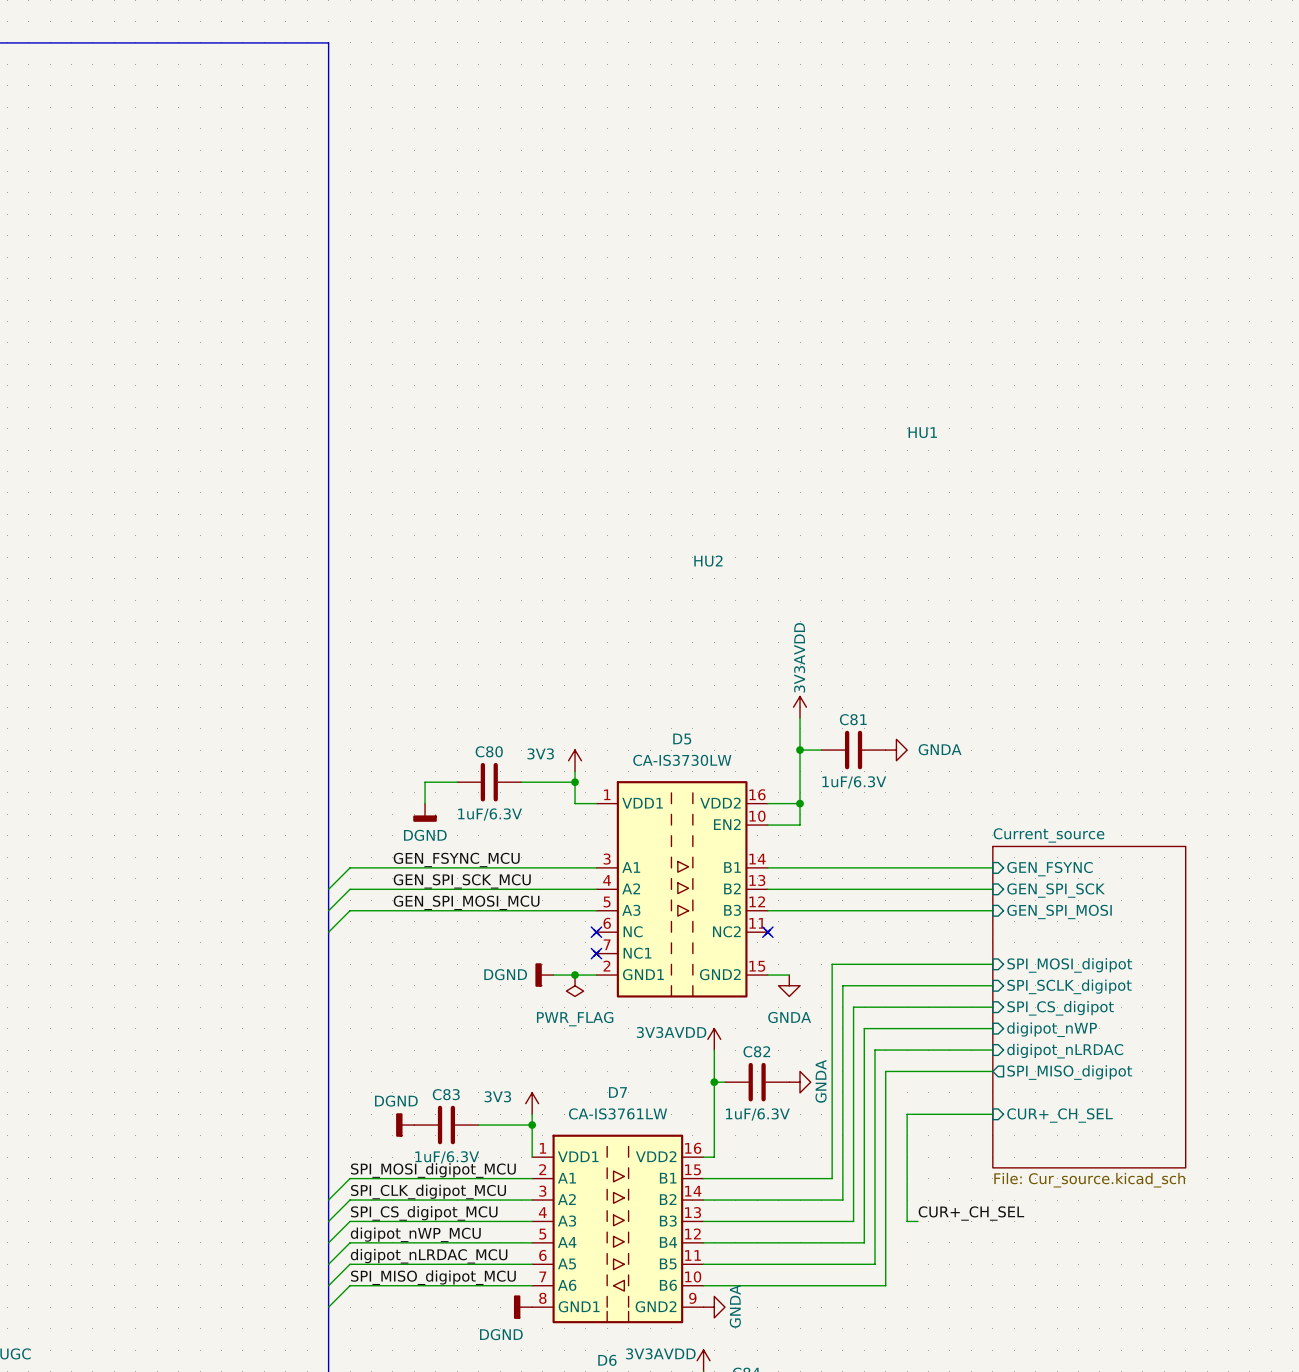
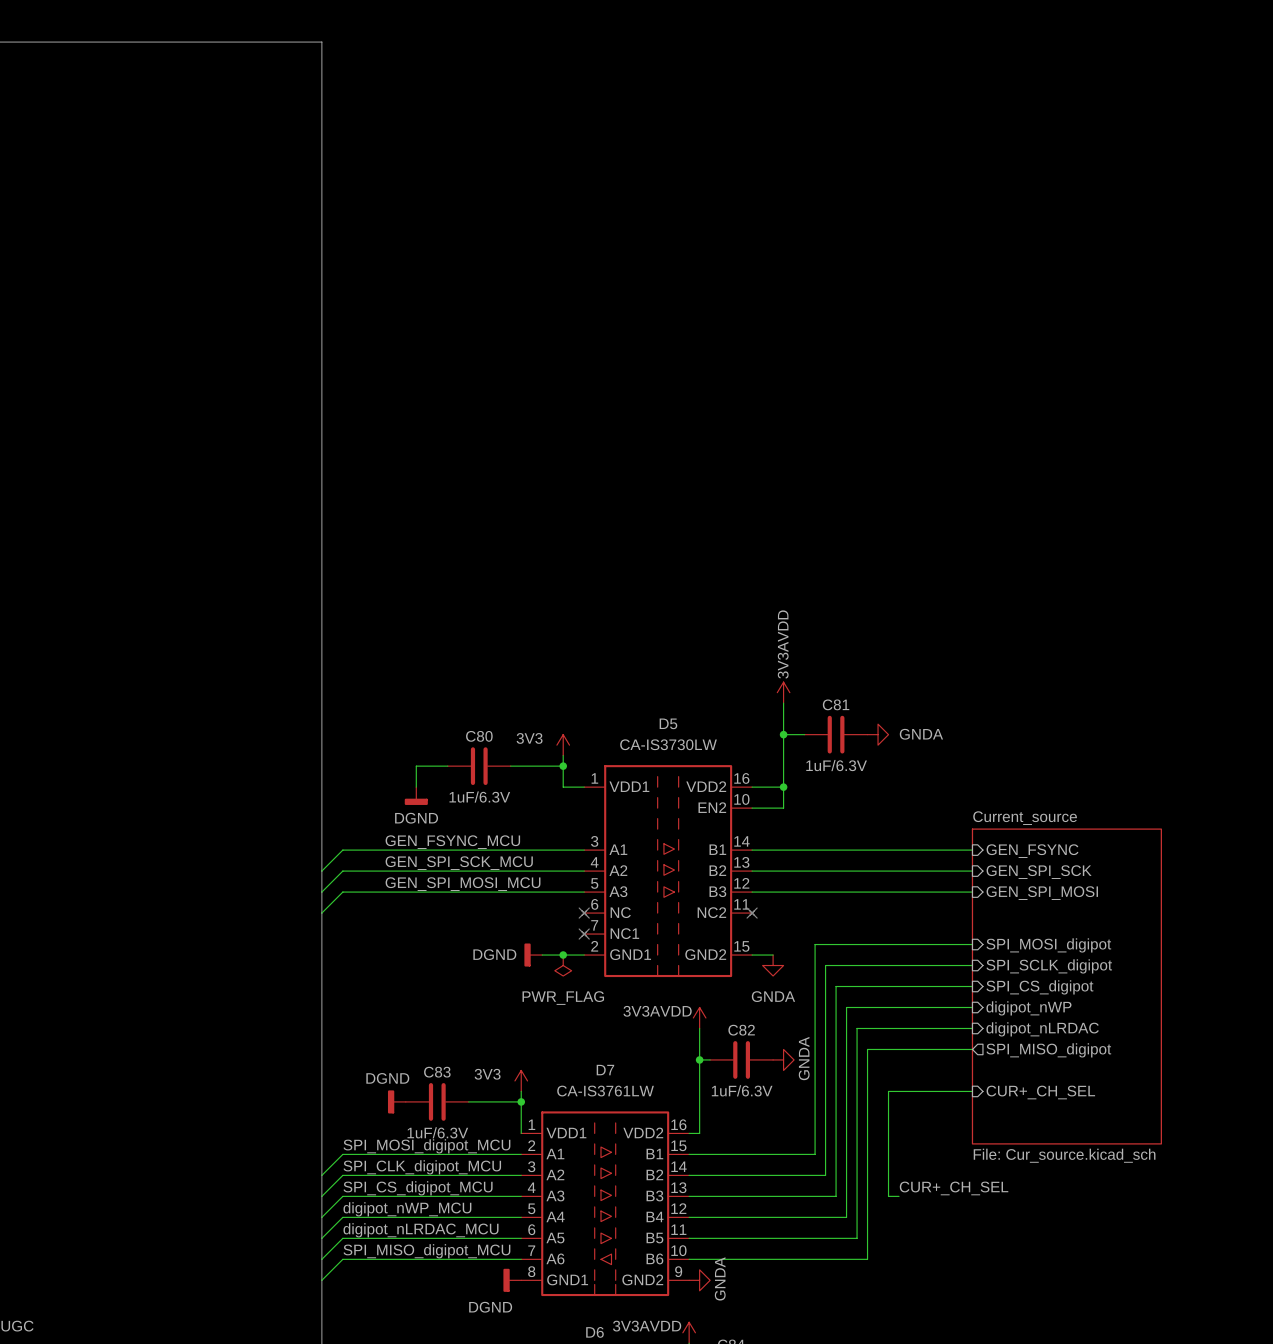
HU1: (922, 432) -> none
HU2: (708, 561) -> none

